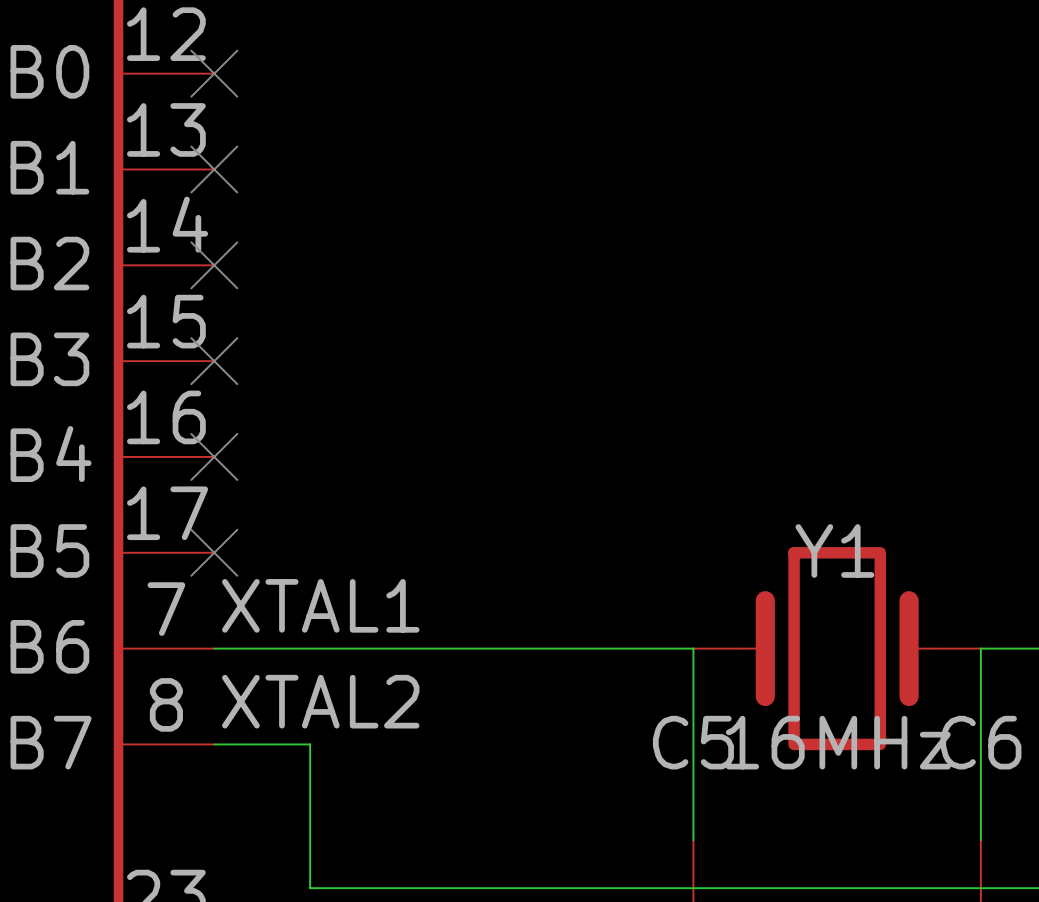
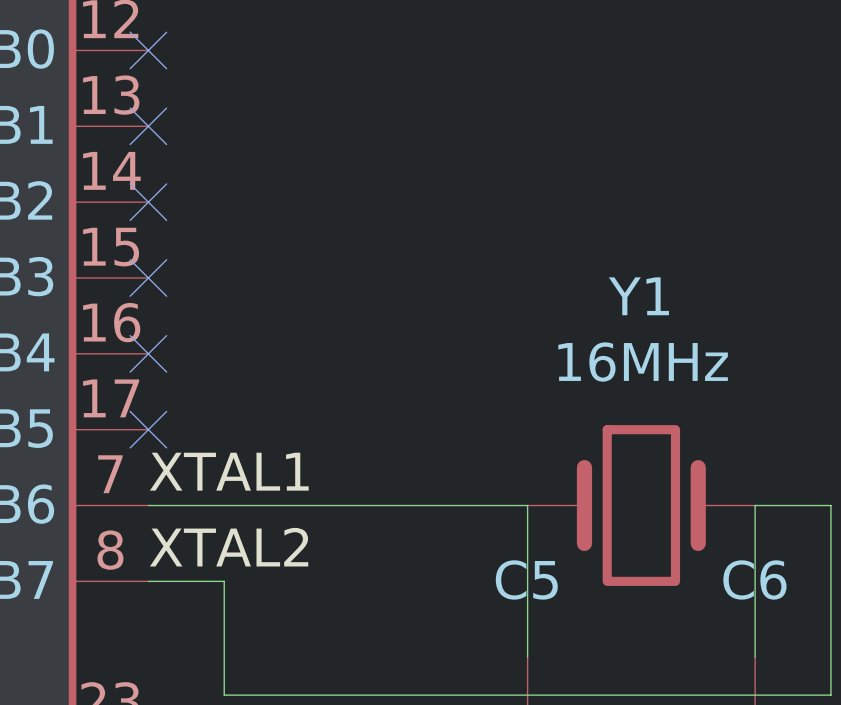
Y1 name position: Y1 (834, 550) -> Y1 (638, 296)
Y1 value position: 16MHz (838, 742) -> 16MHz (643, 362)

